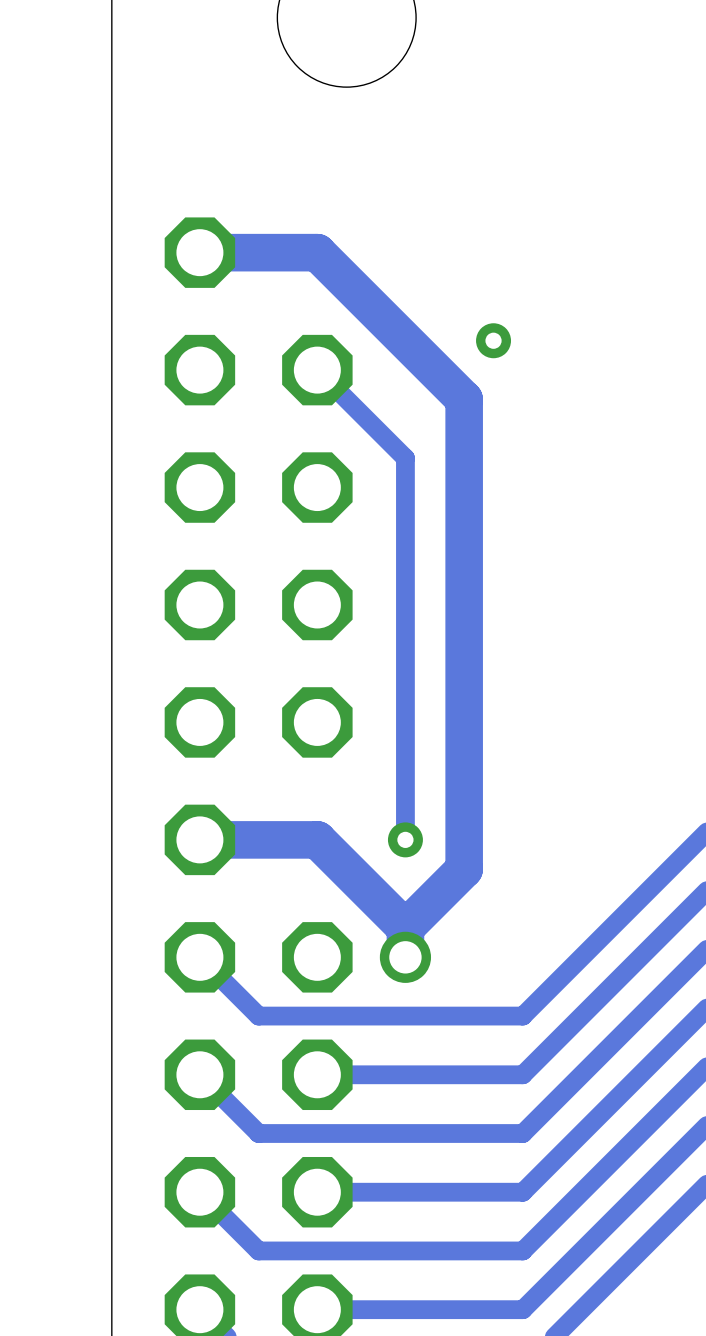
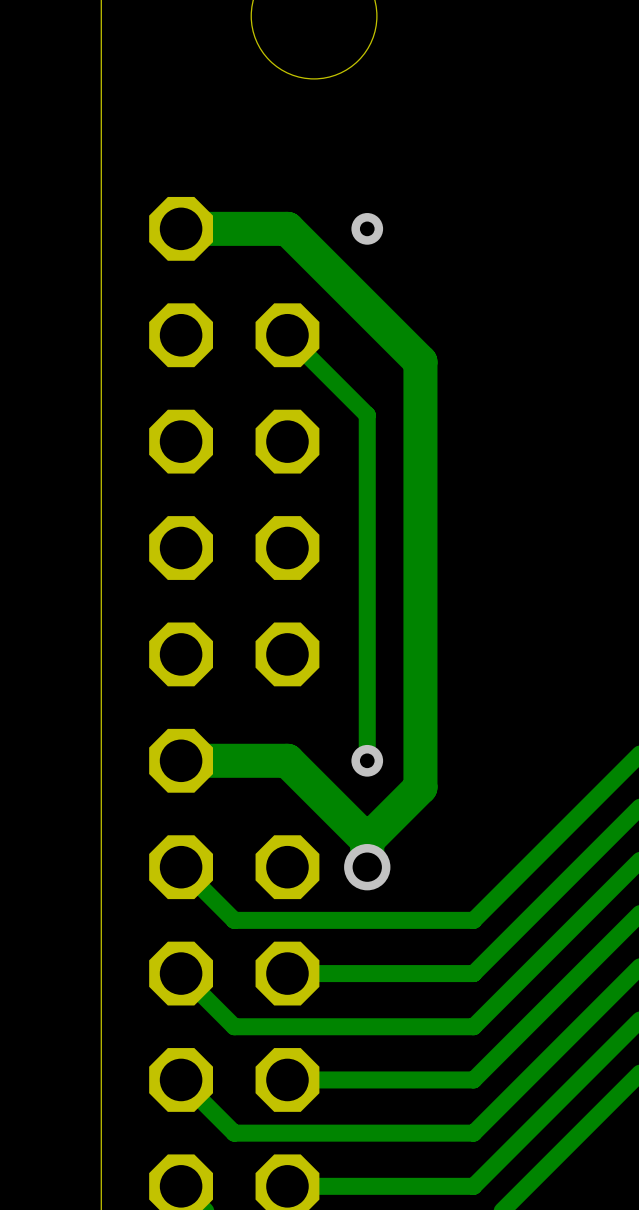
via position: (493, 340) -> (367, 228)

